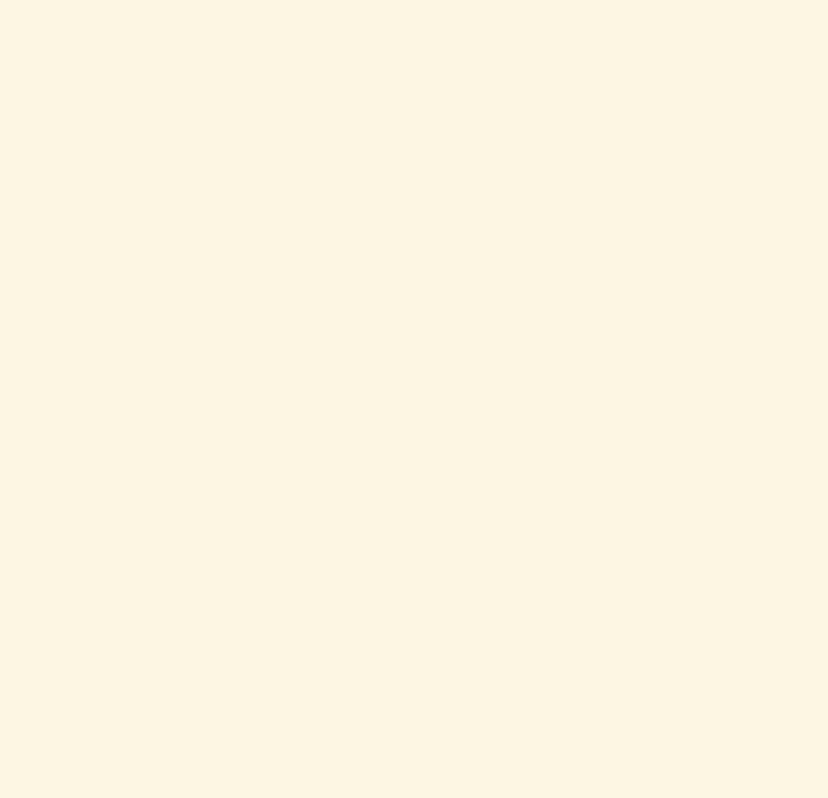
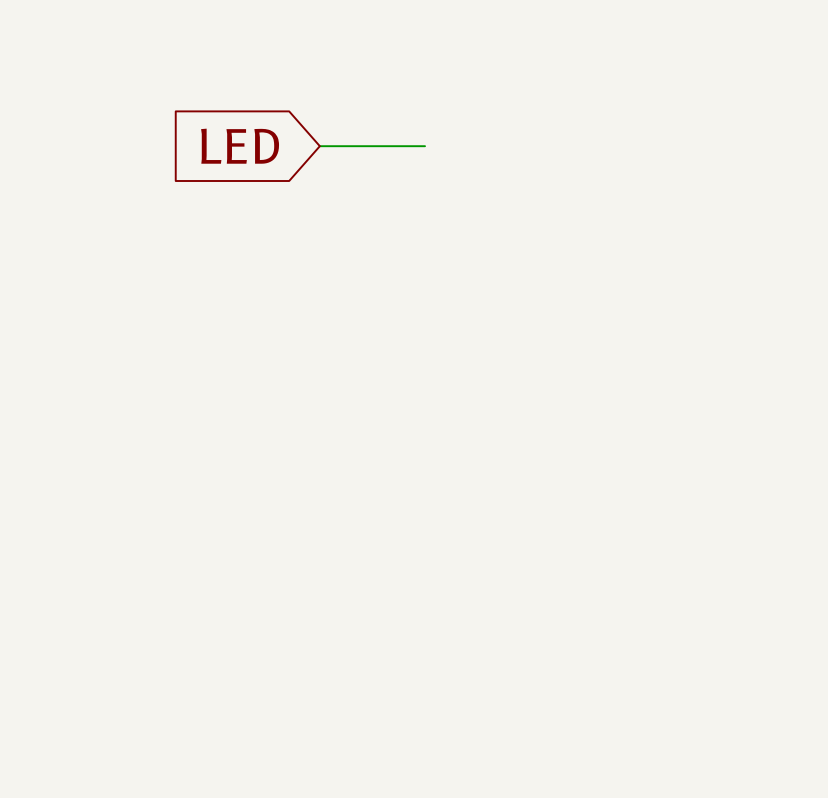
global label: none -> LED (240, 146)
wire: none -> (319, 146) (425, 146)

